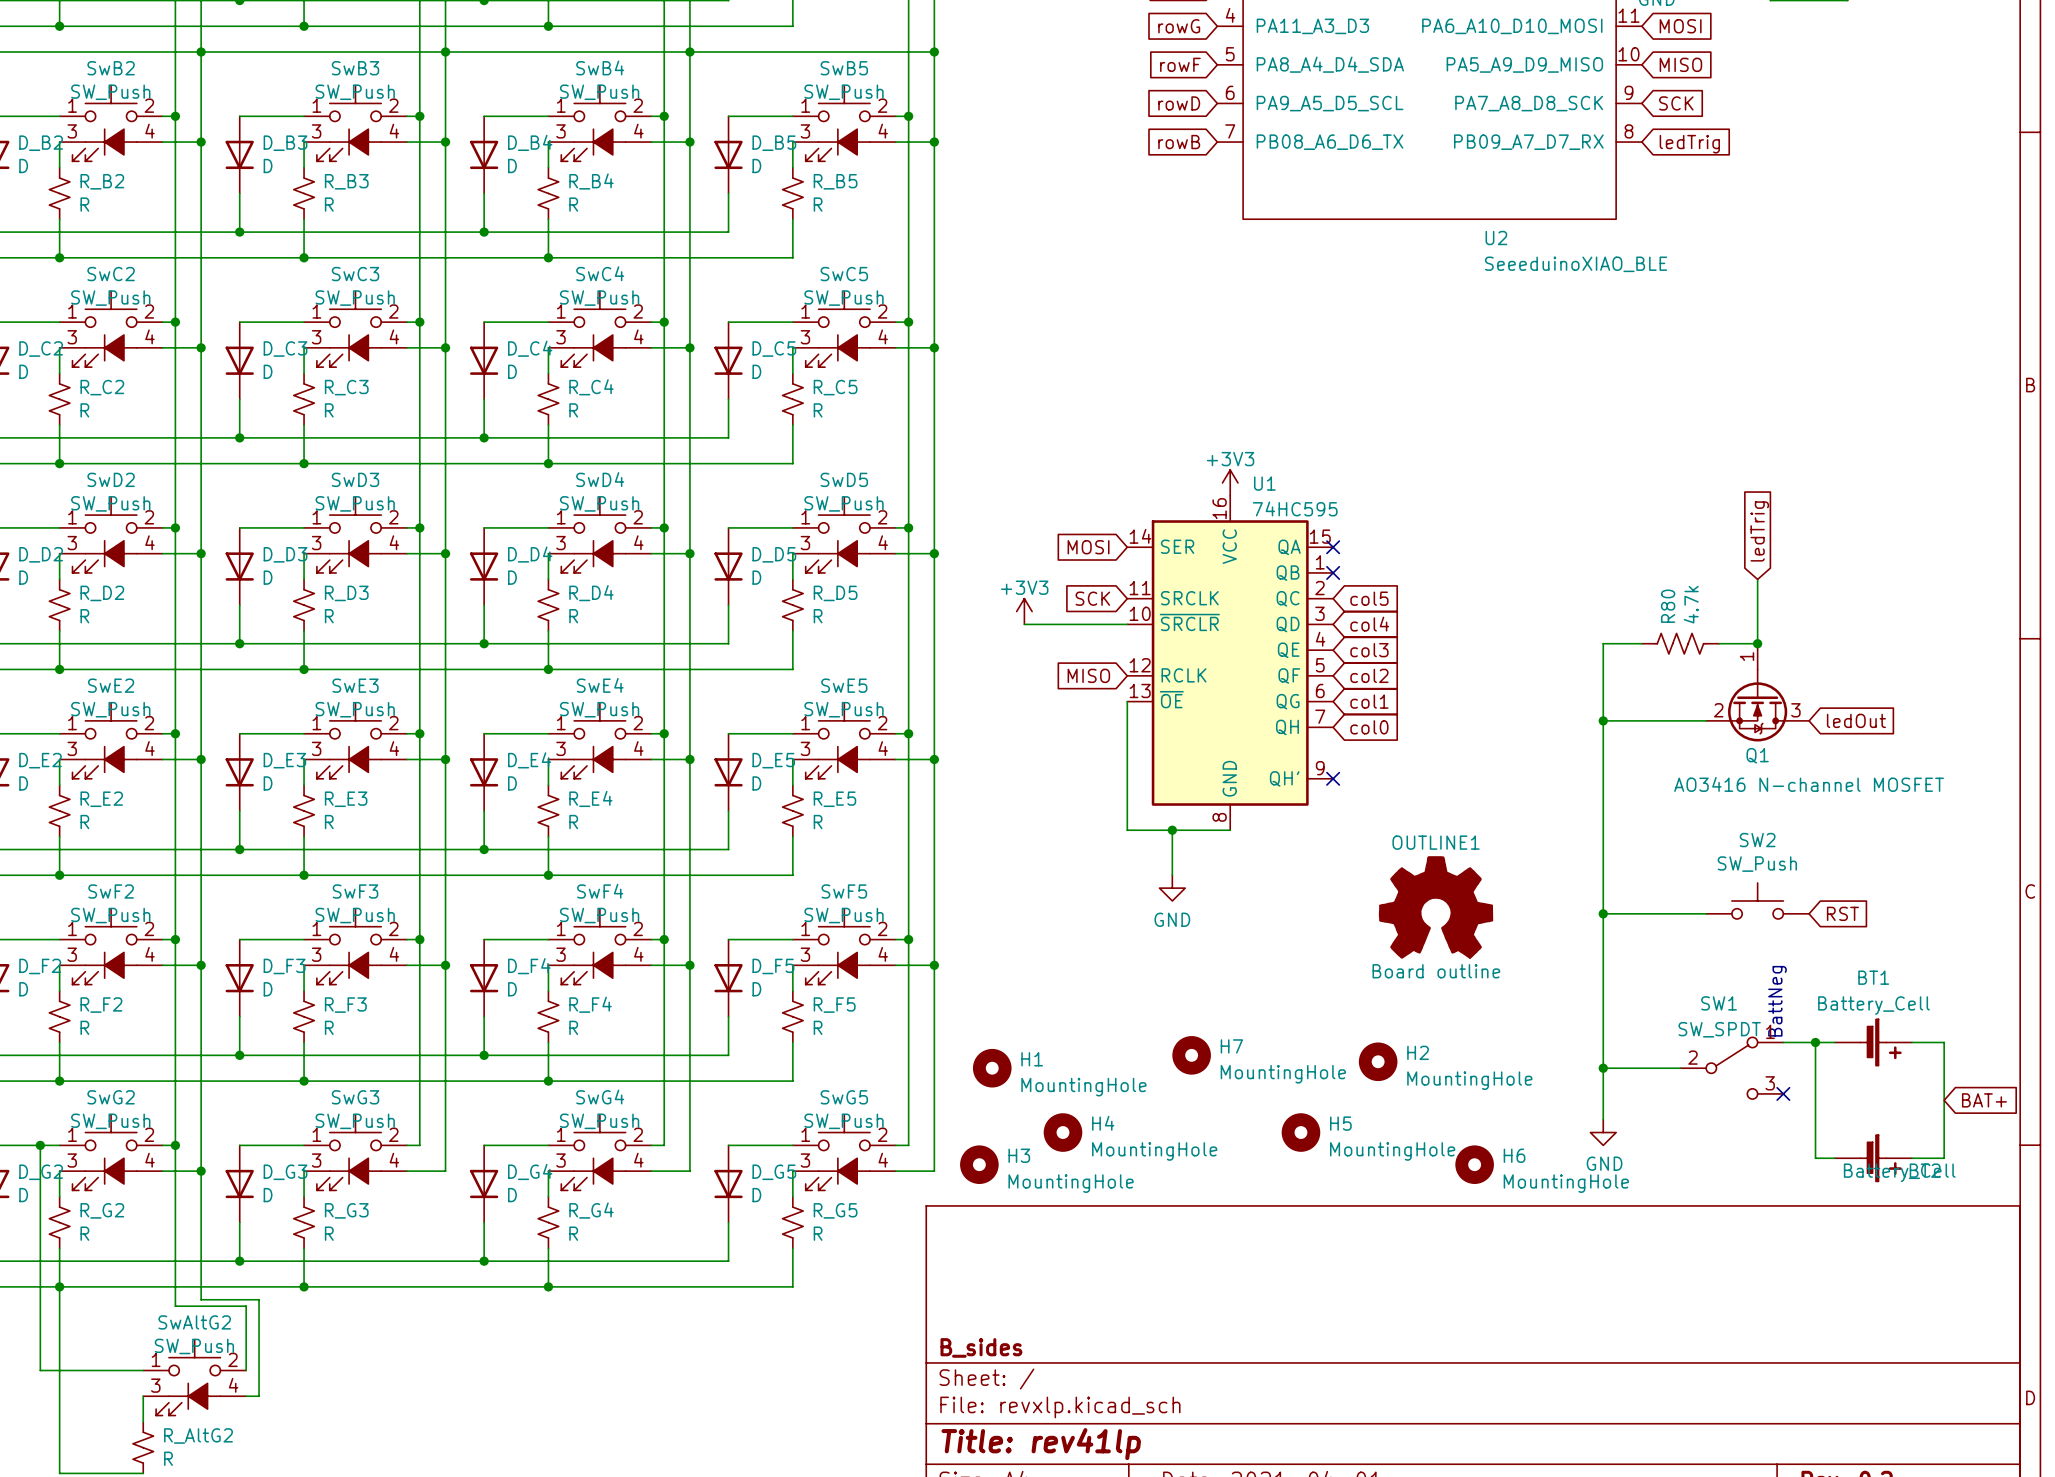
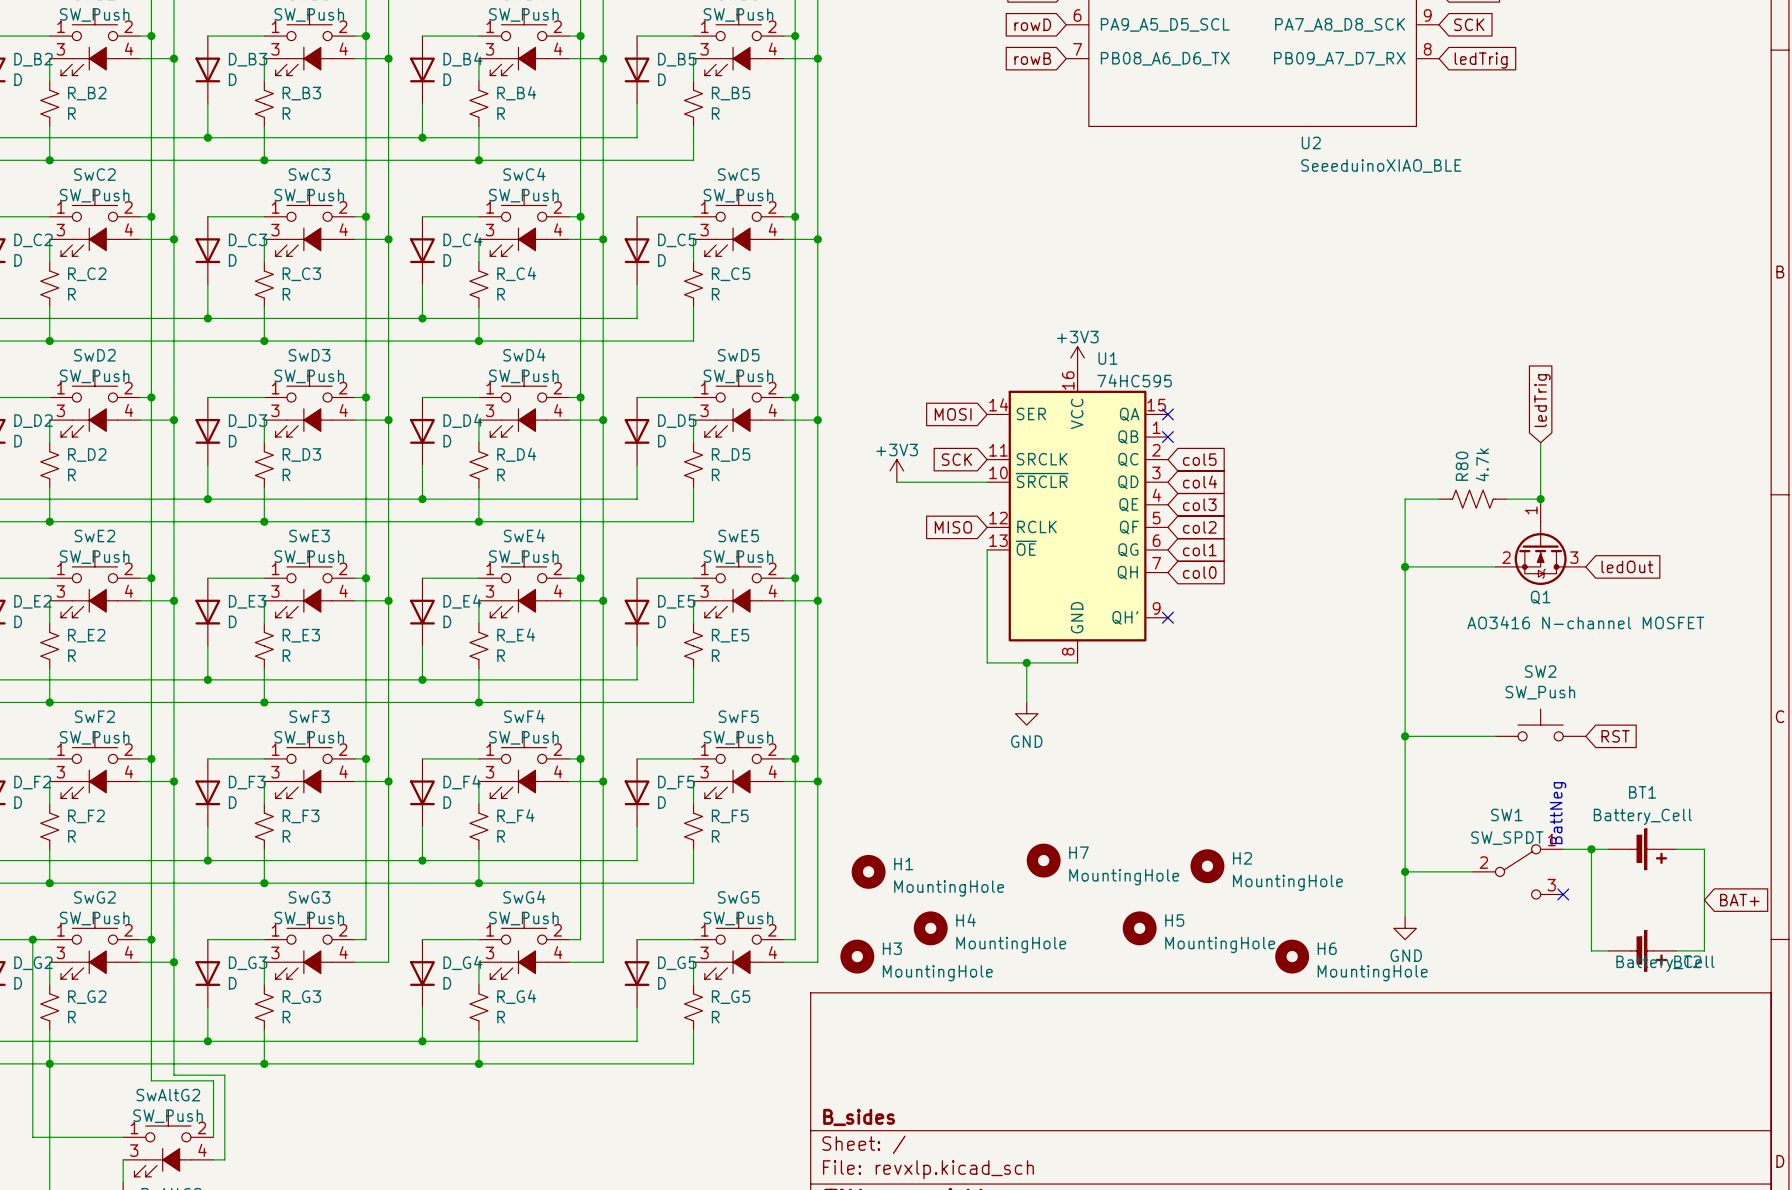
OUTLINE1: Board outline (1436, 907) -> none

